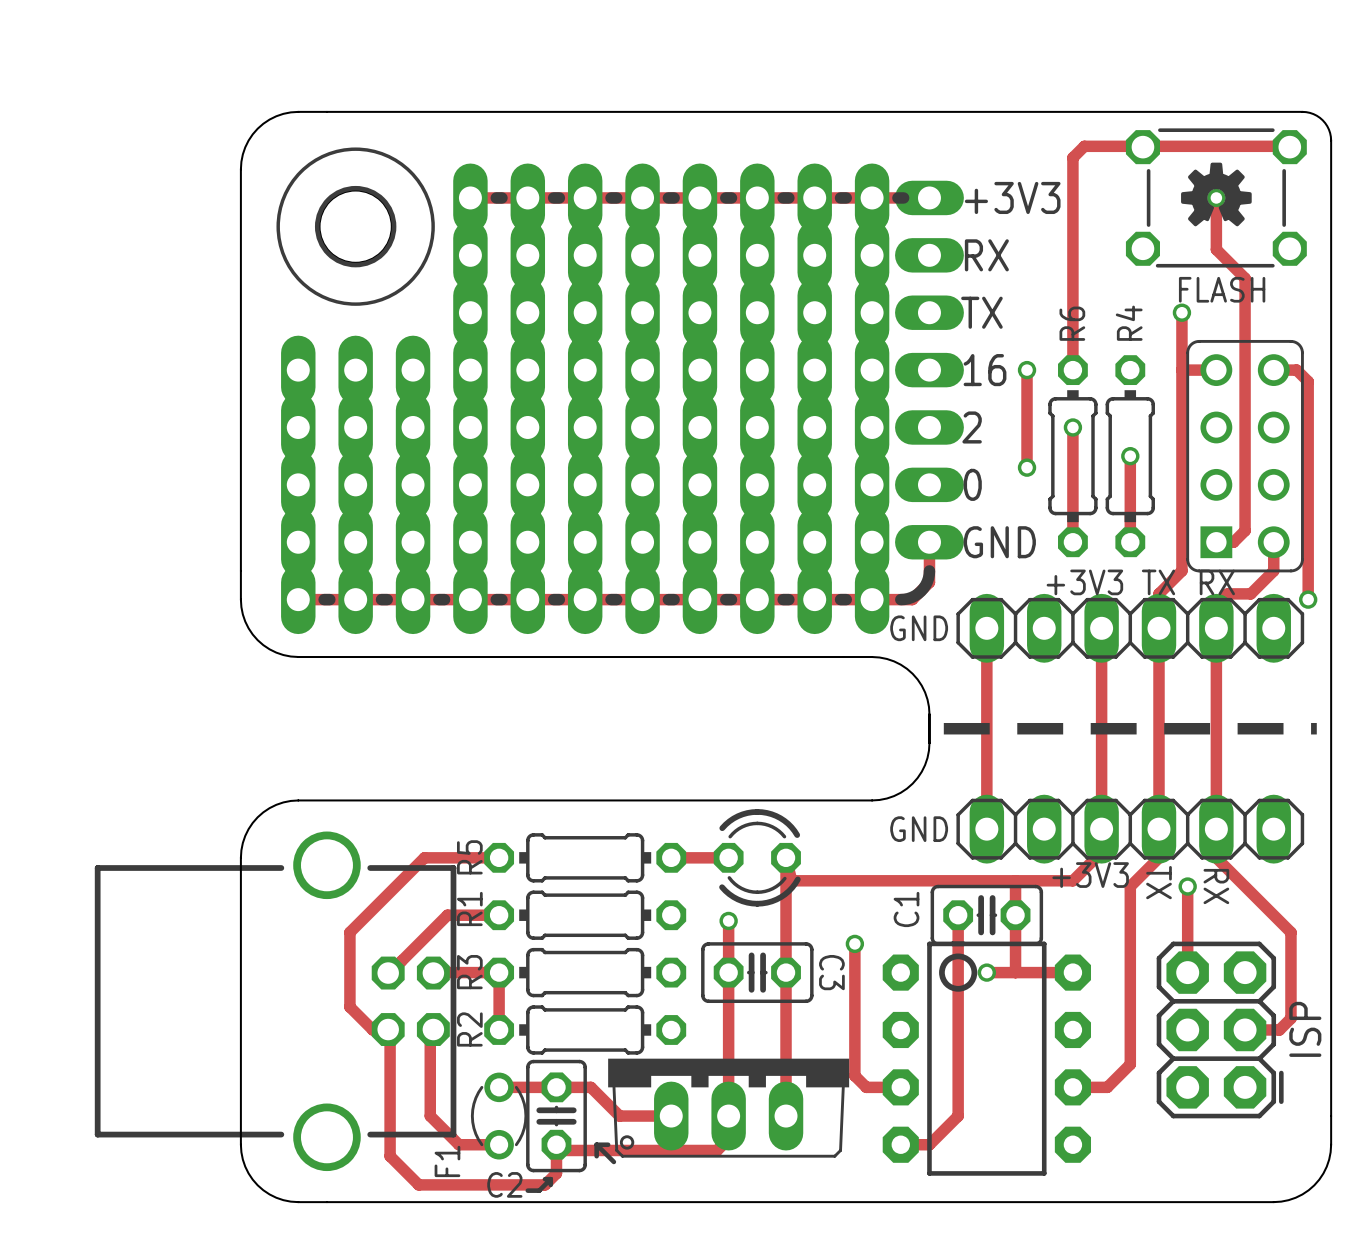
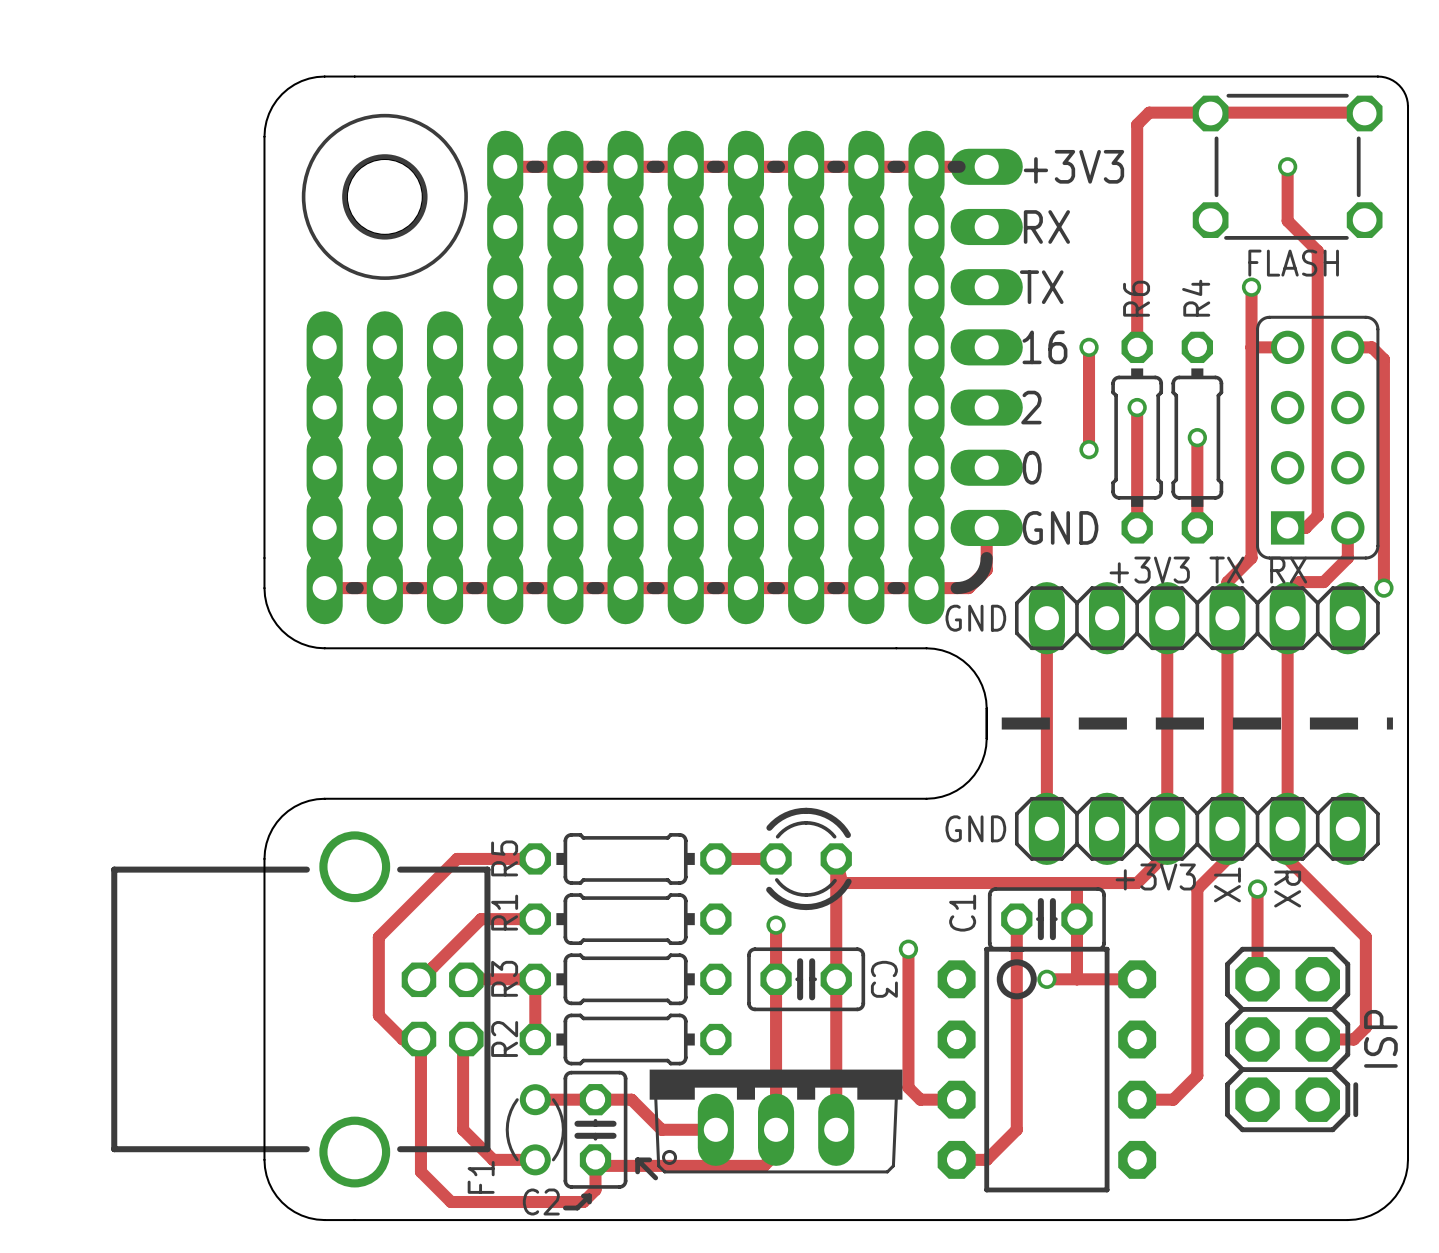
drawing: [1181, 162, 1252, 227] -> none

